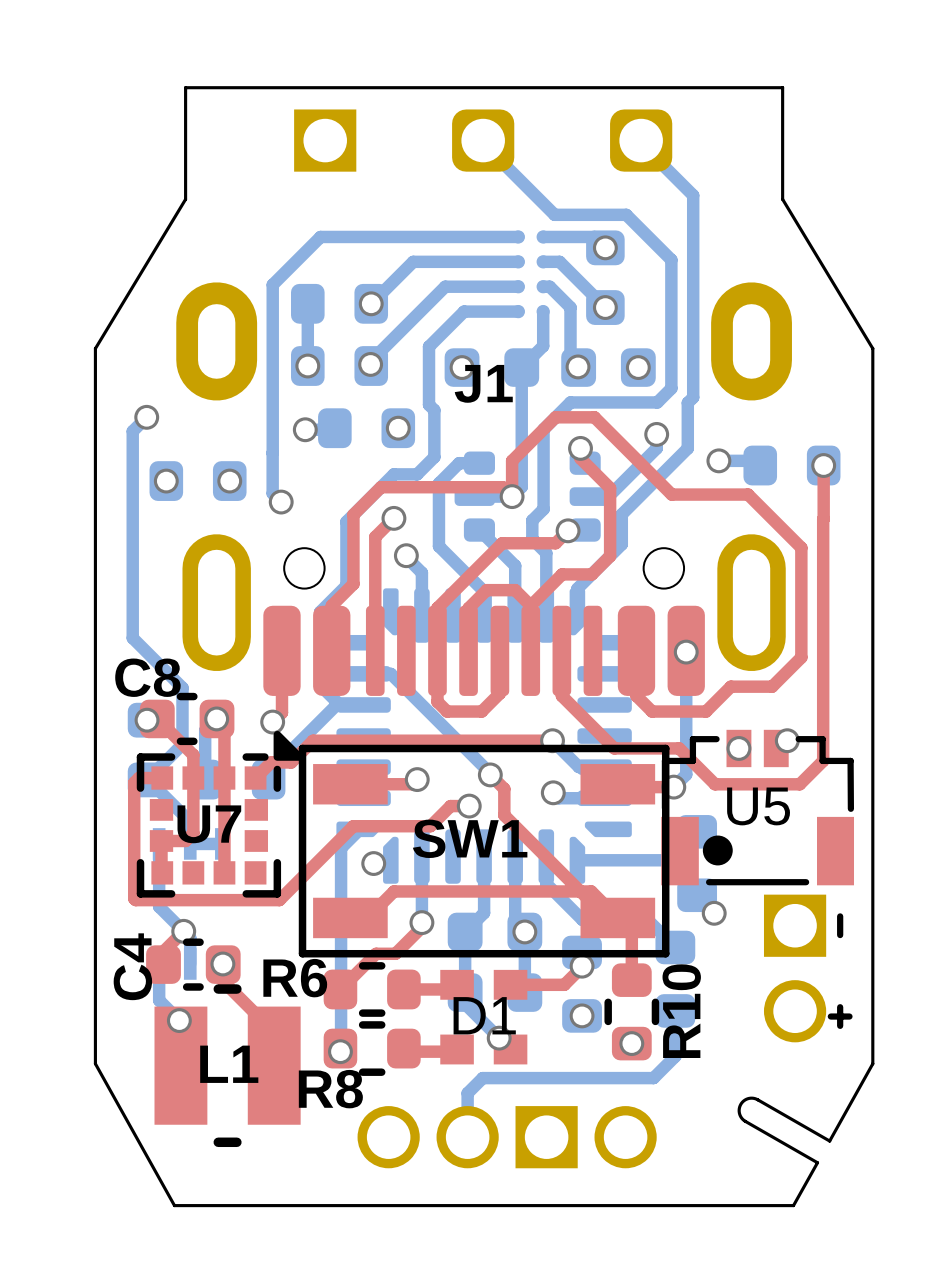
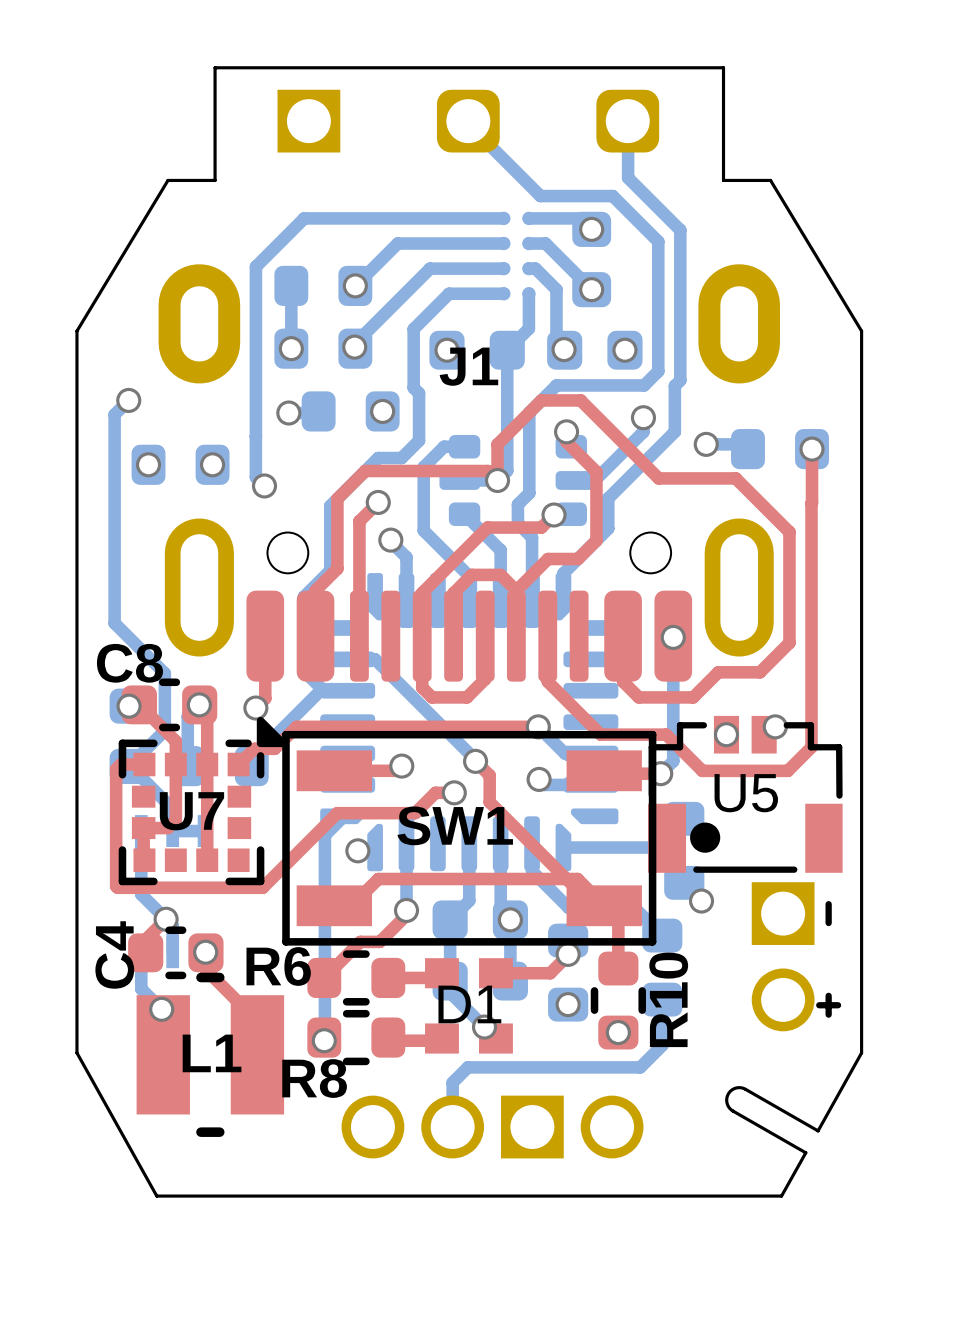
board edge: (232, 87) (185, 87) (185, 199) -> (215, 67) (215, 180) (167, 180)
board edge: (735, 87) (782, 87) (782, 199) -> (723, 67) (723, 180) (770, 180)
bottom track: (641, 143) (693, 195) (693, 248) -> (628, 124) (628, 177) (680, 230)

